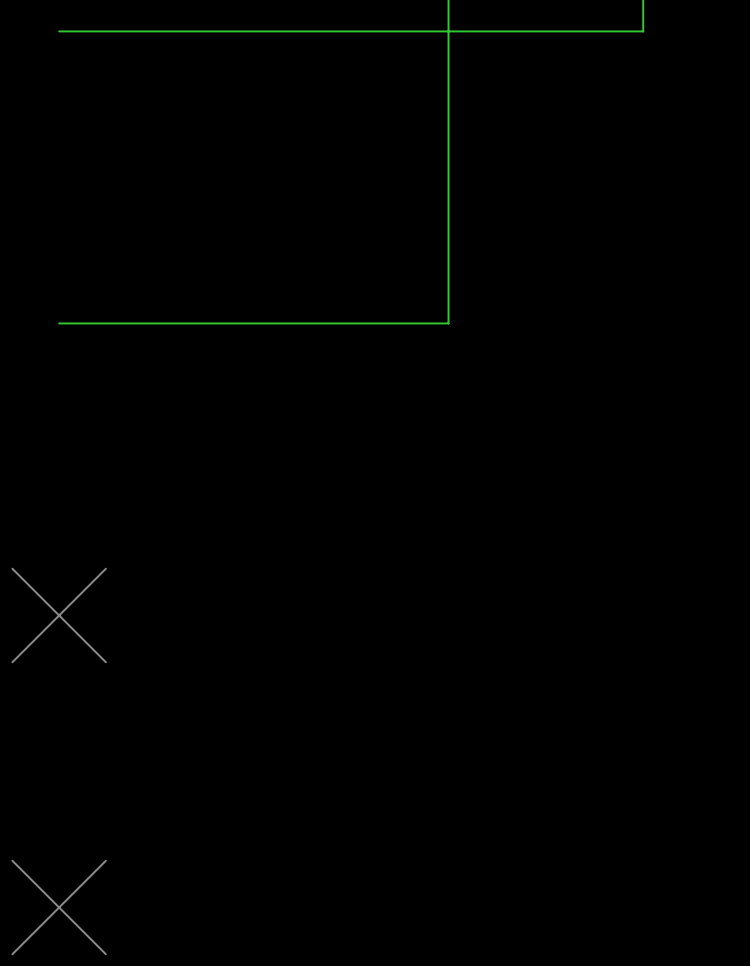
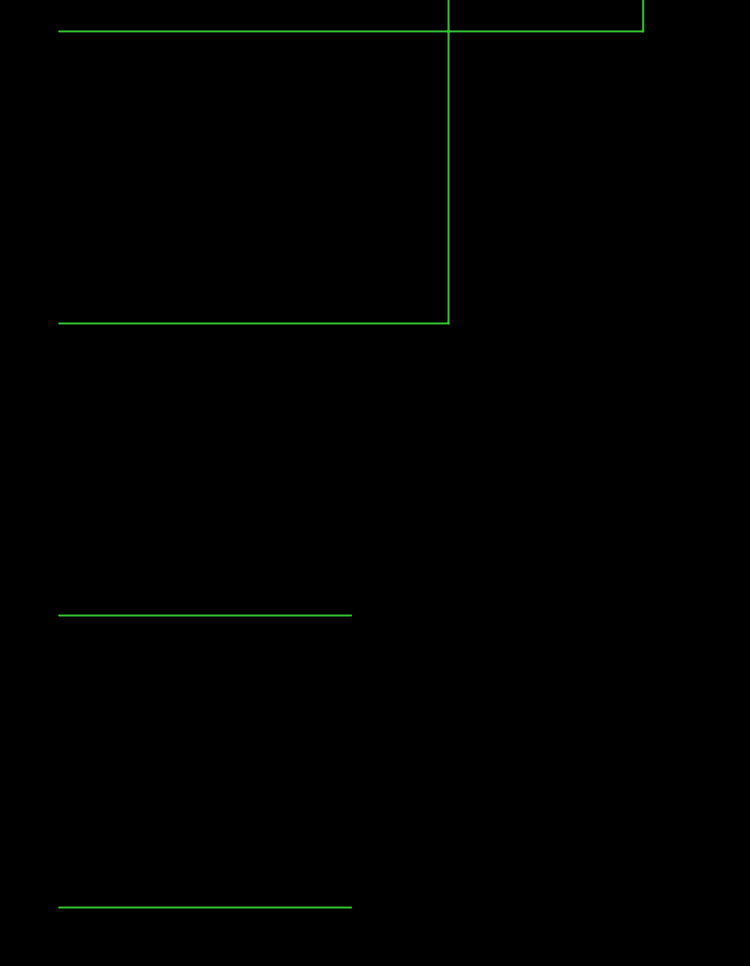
wire: none -> (59, 615) (351, 615)
no-connect mark: (59, 615) -> none
wire: none -> (59, 907) (351, 907)
no-connect mark: (59, 907) -> none

